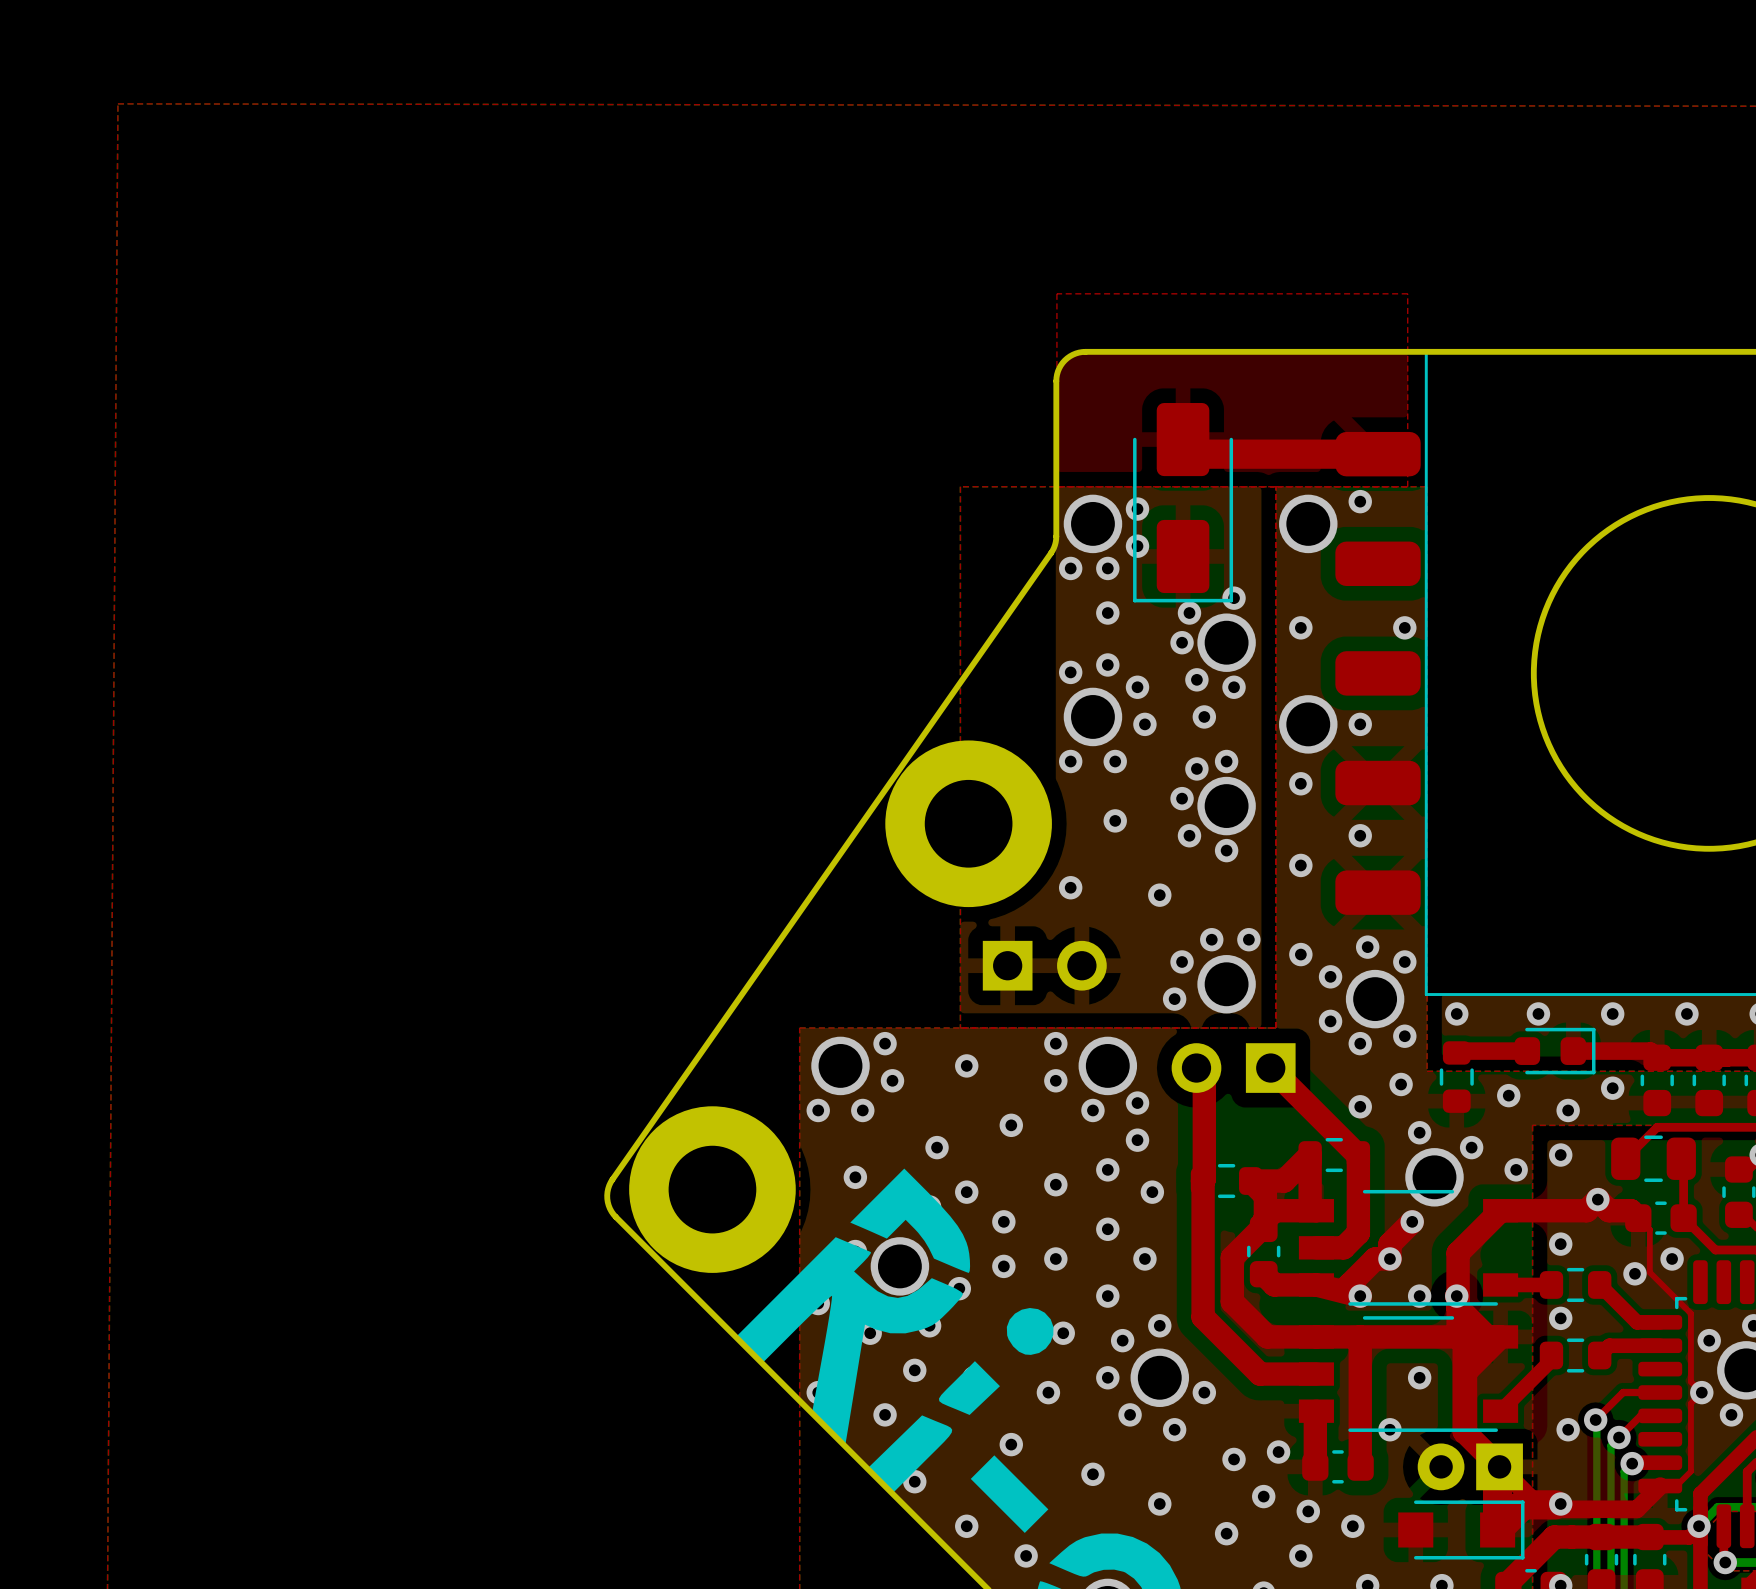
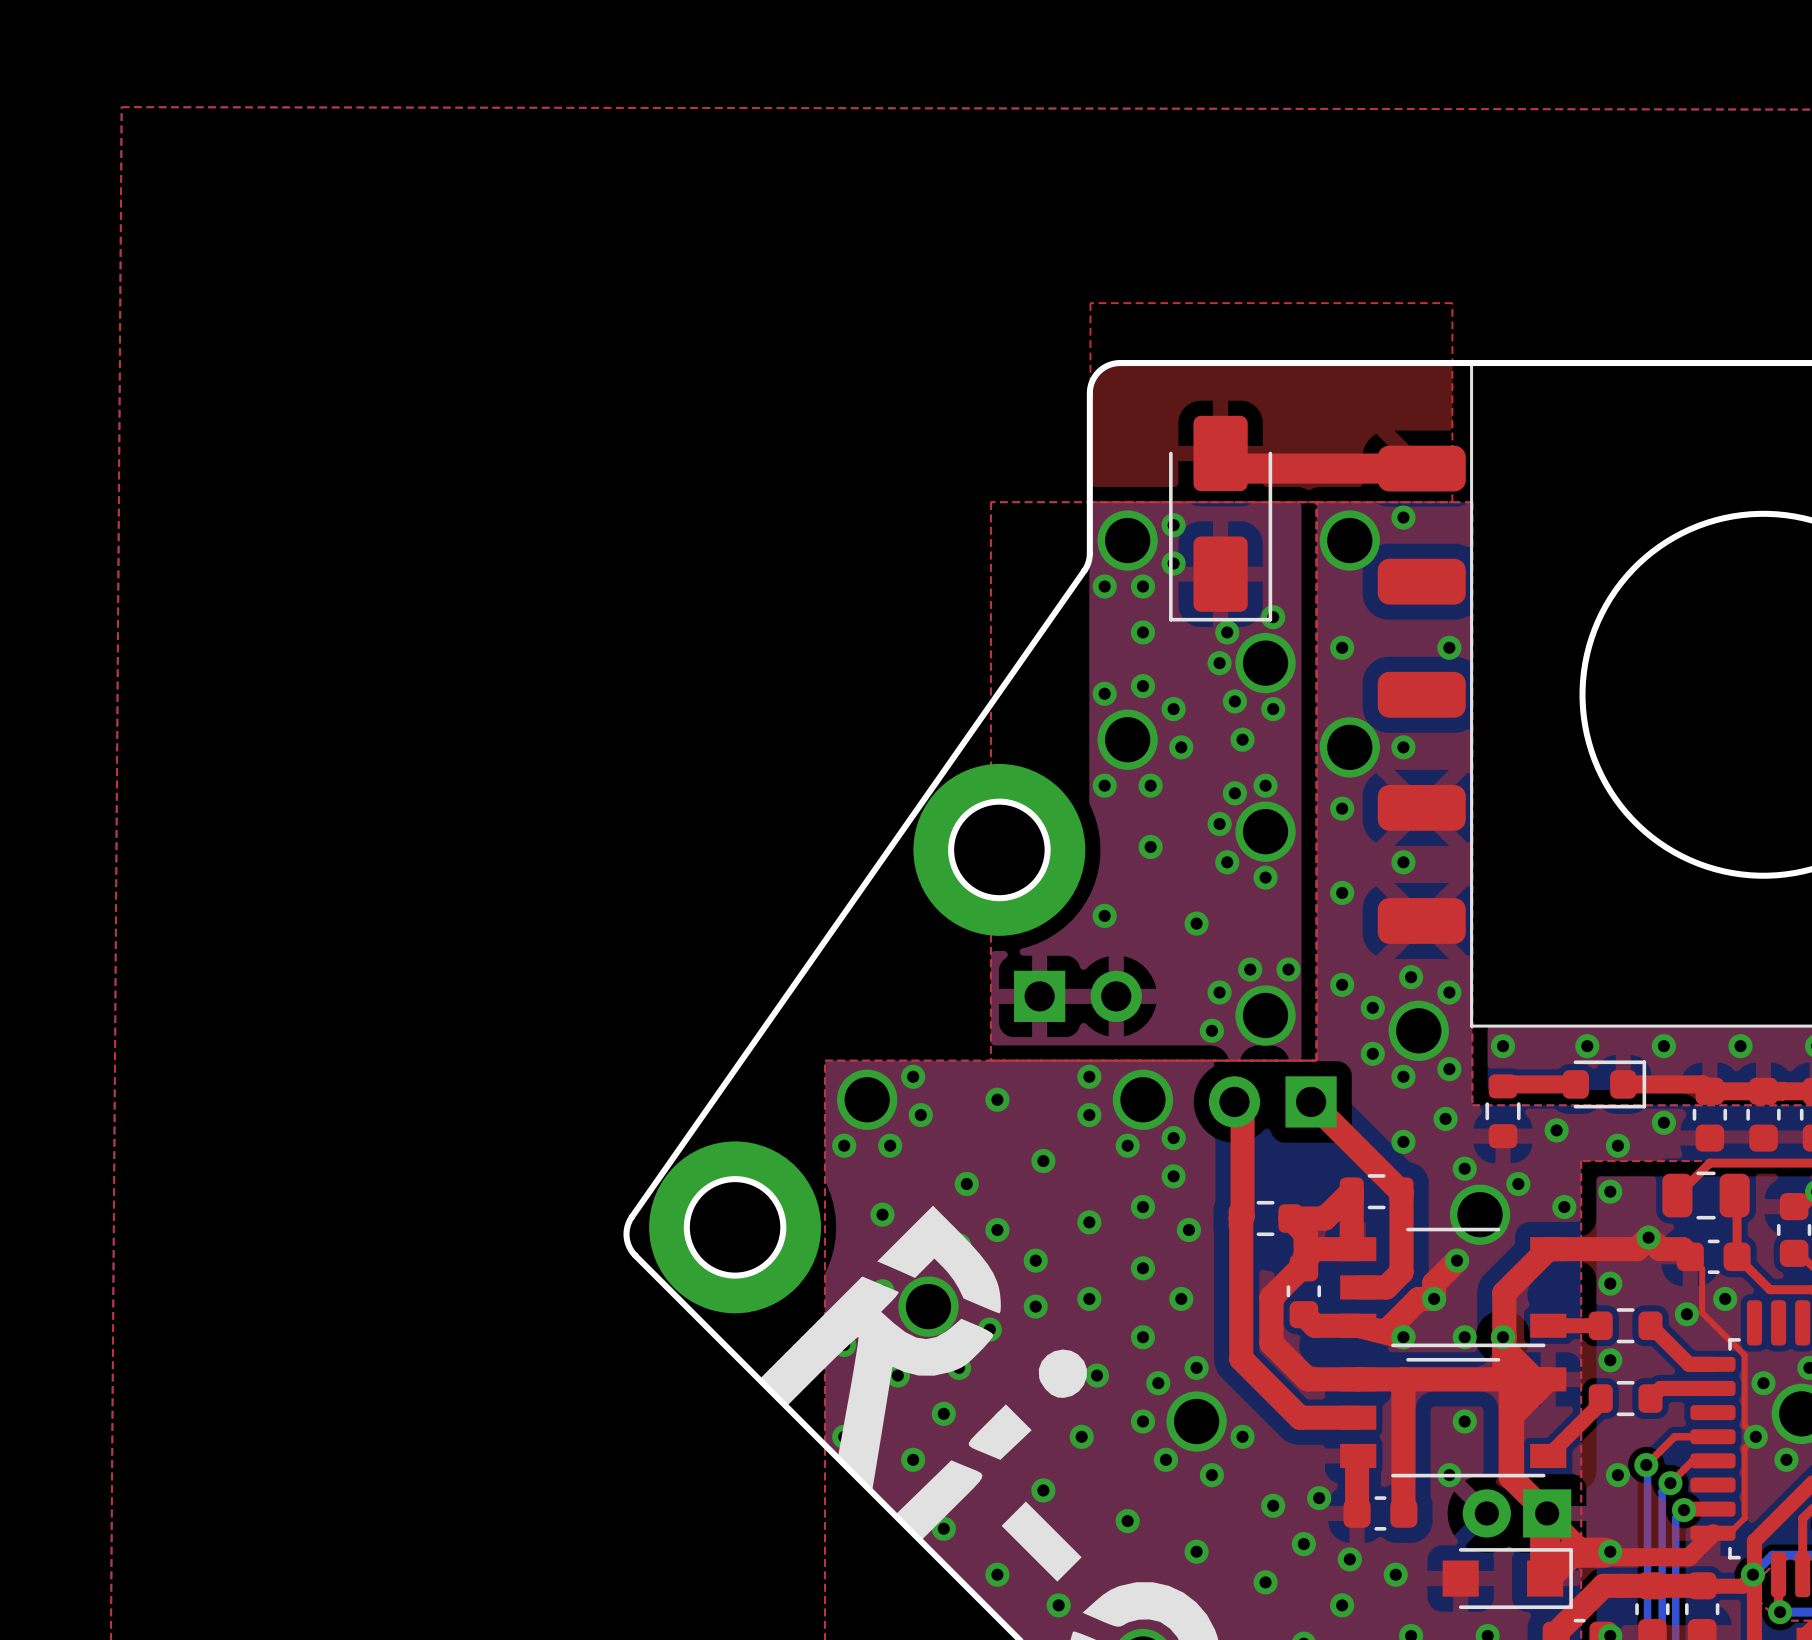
via position: (1389, 1429) -> (1449, 1475)

